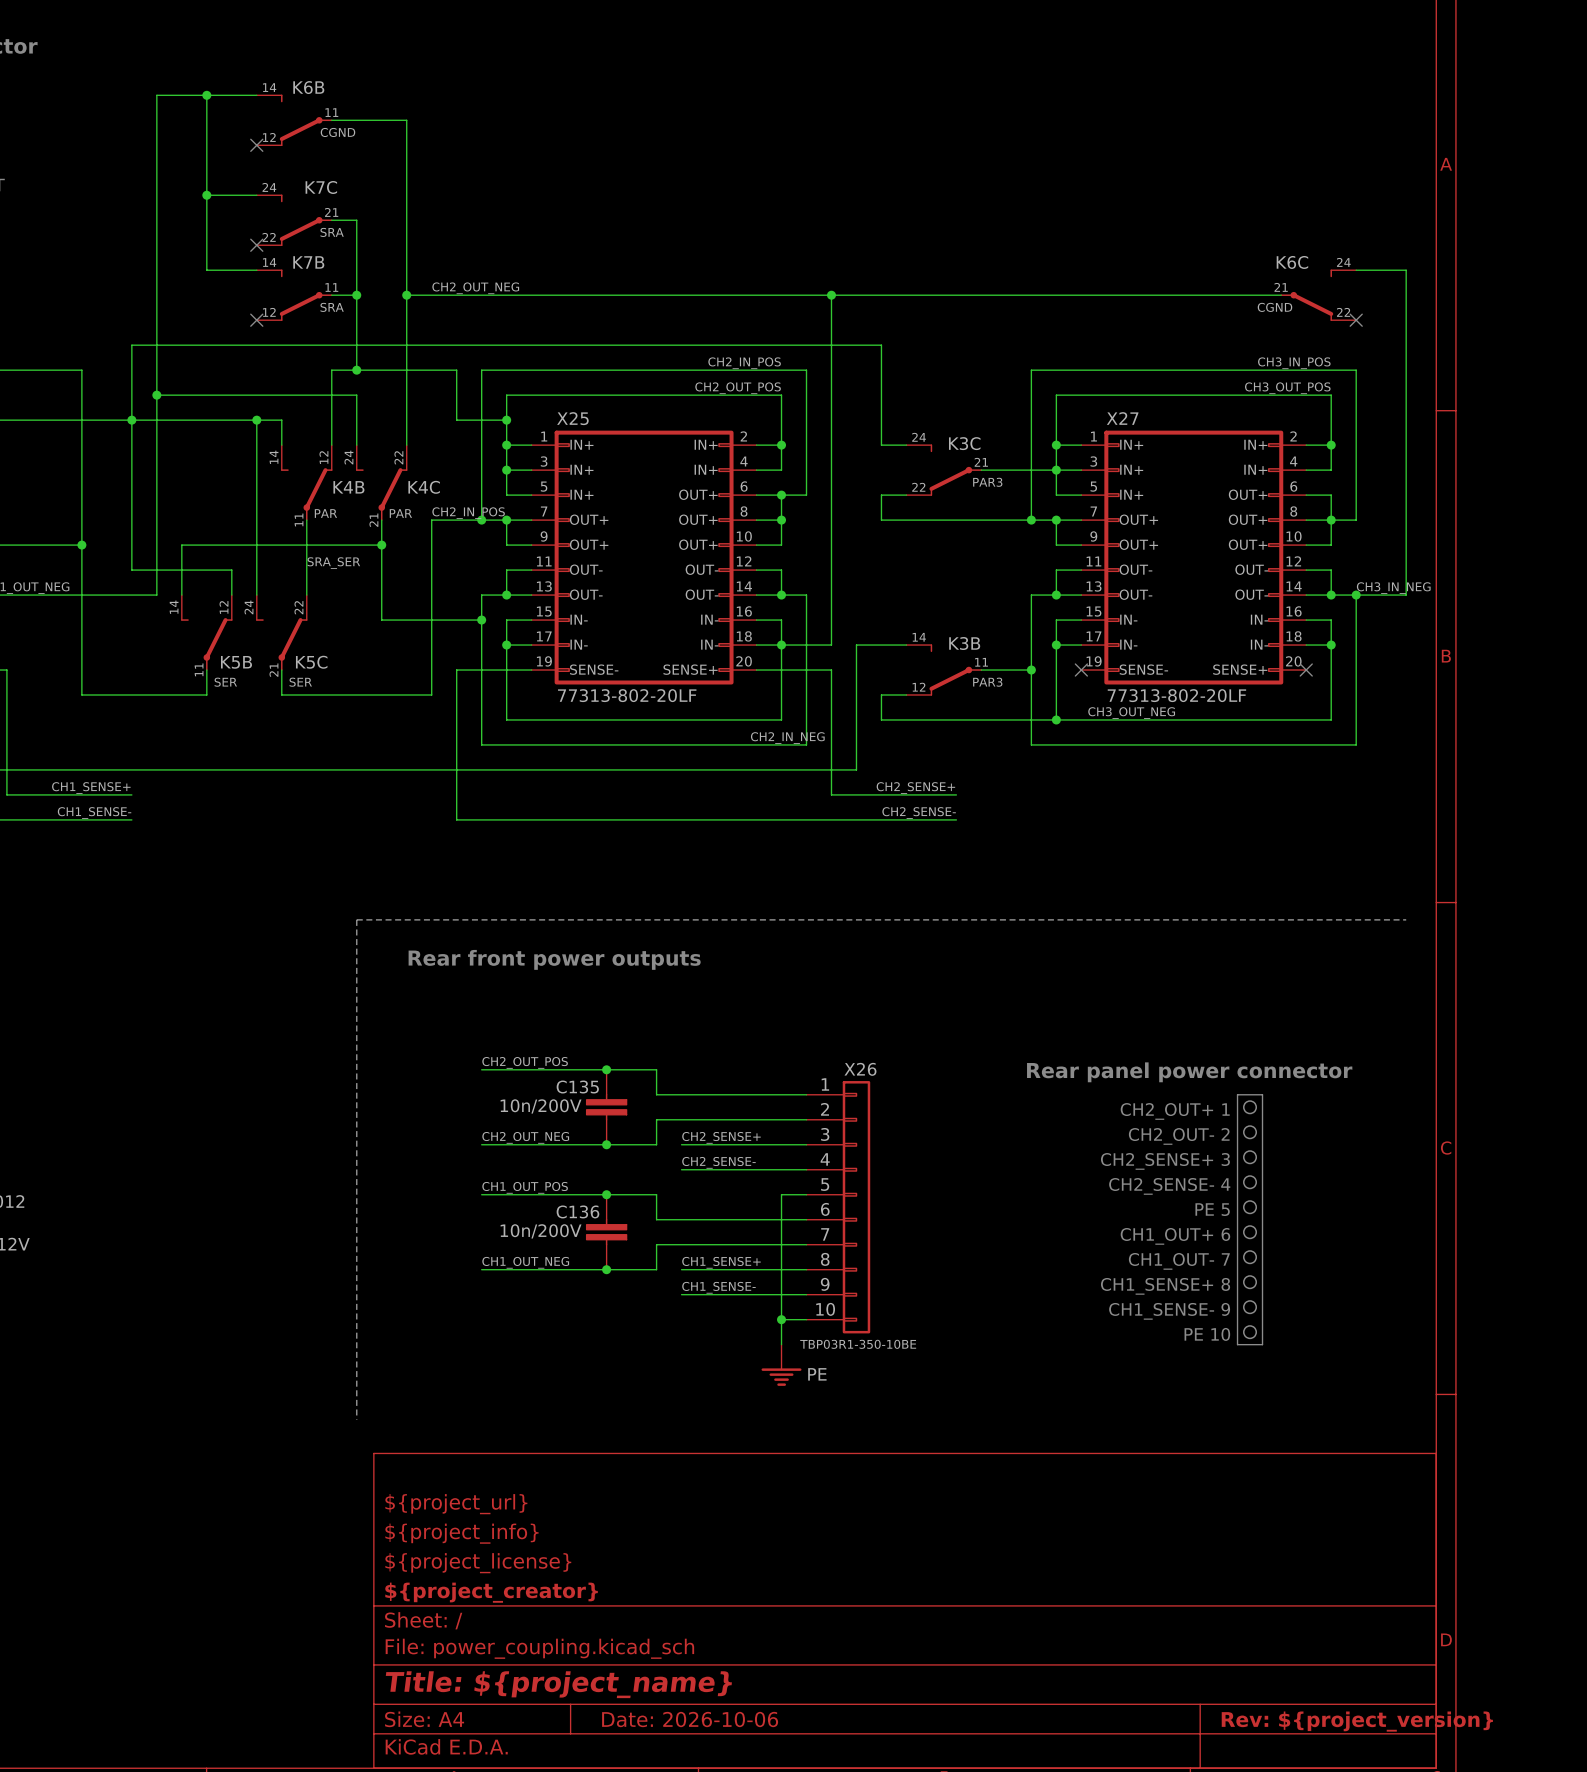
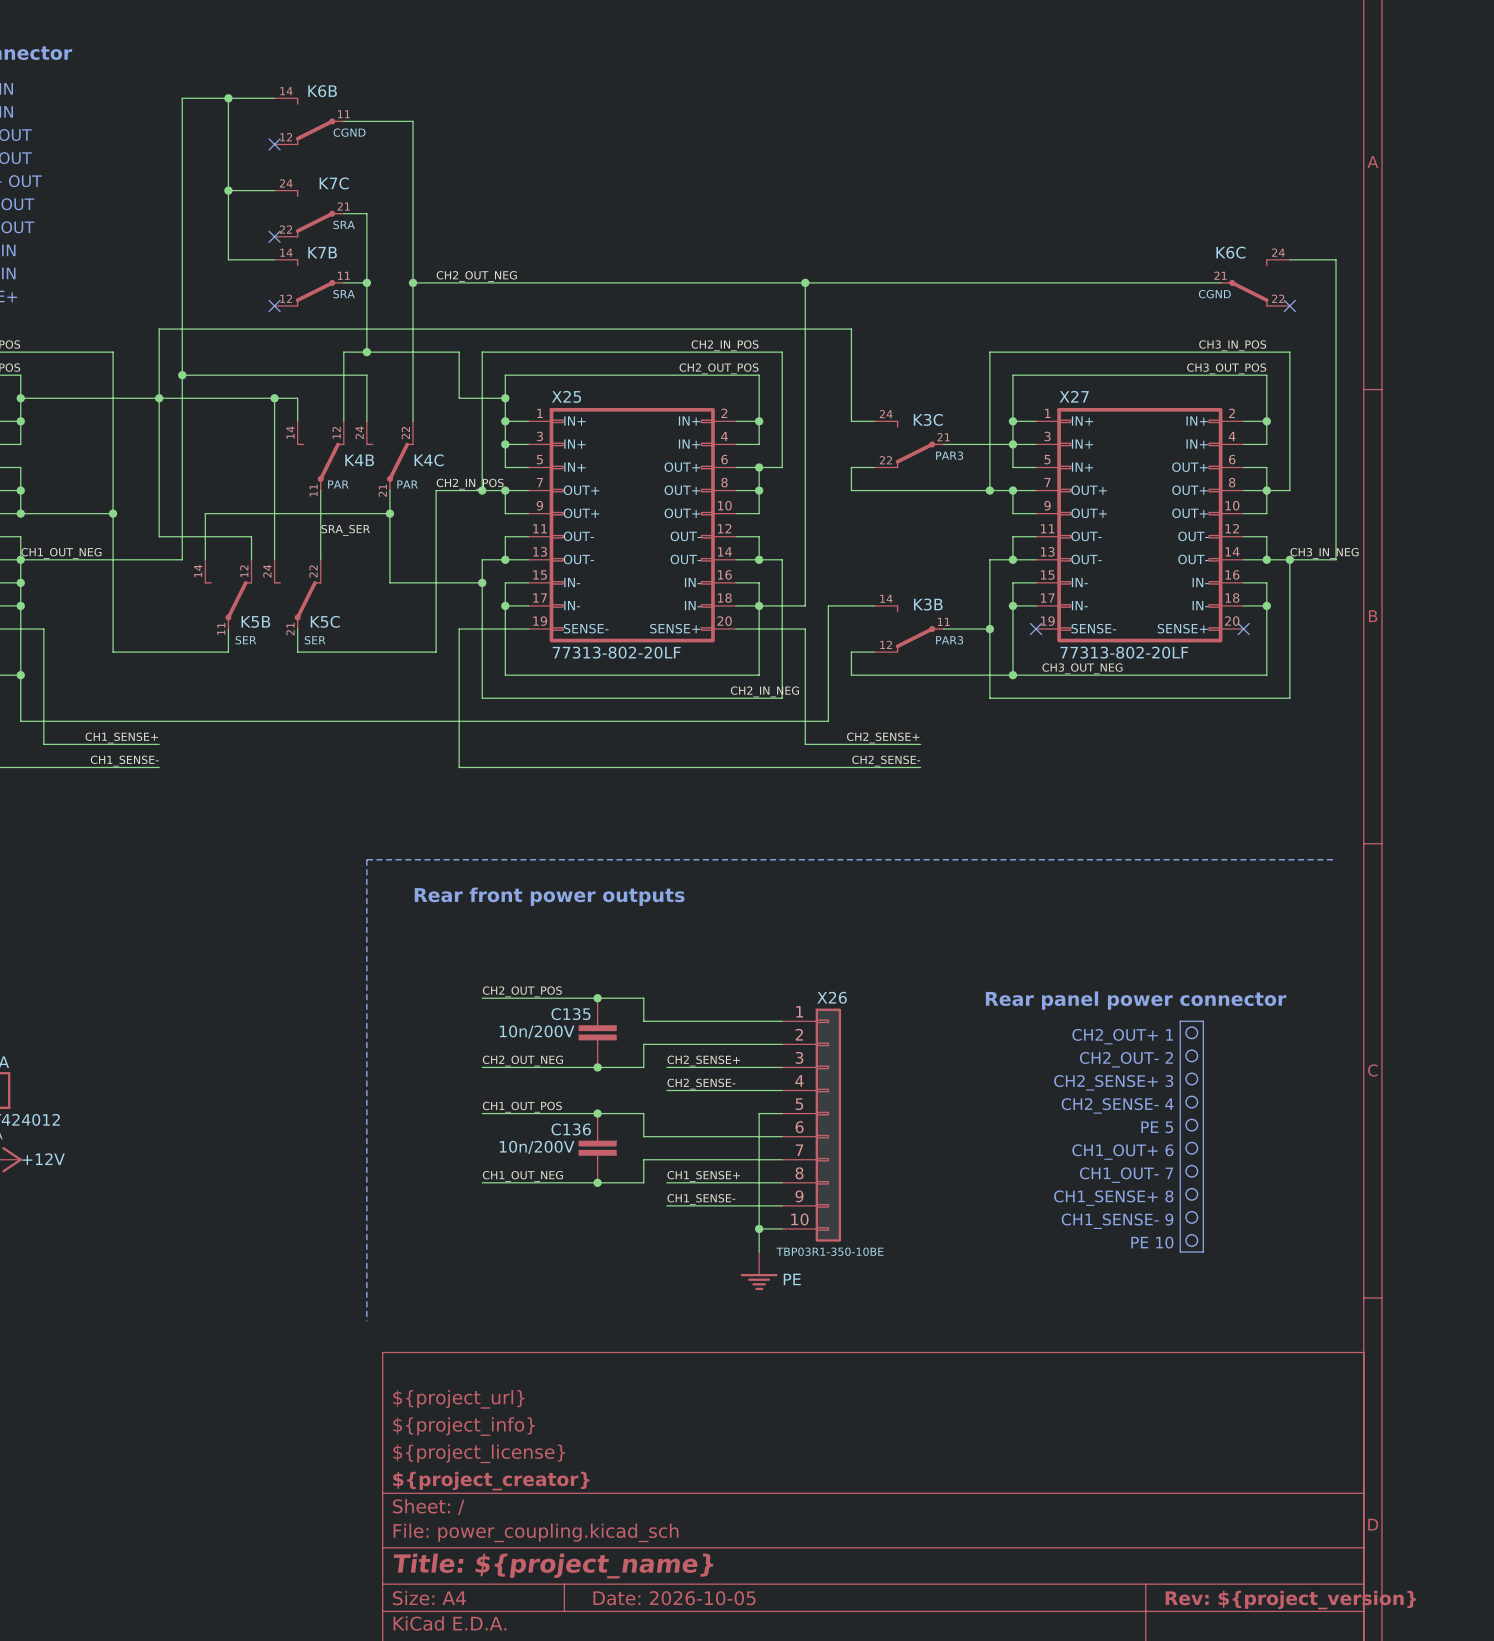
title block: Date: 2026-10-06 (690, 1719) -> Date: 2026-10-05 (674, 1598)

